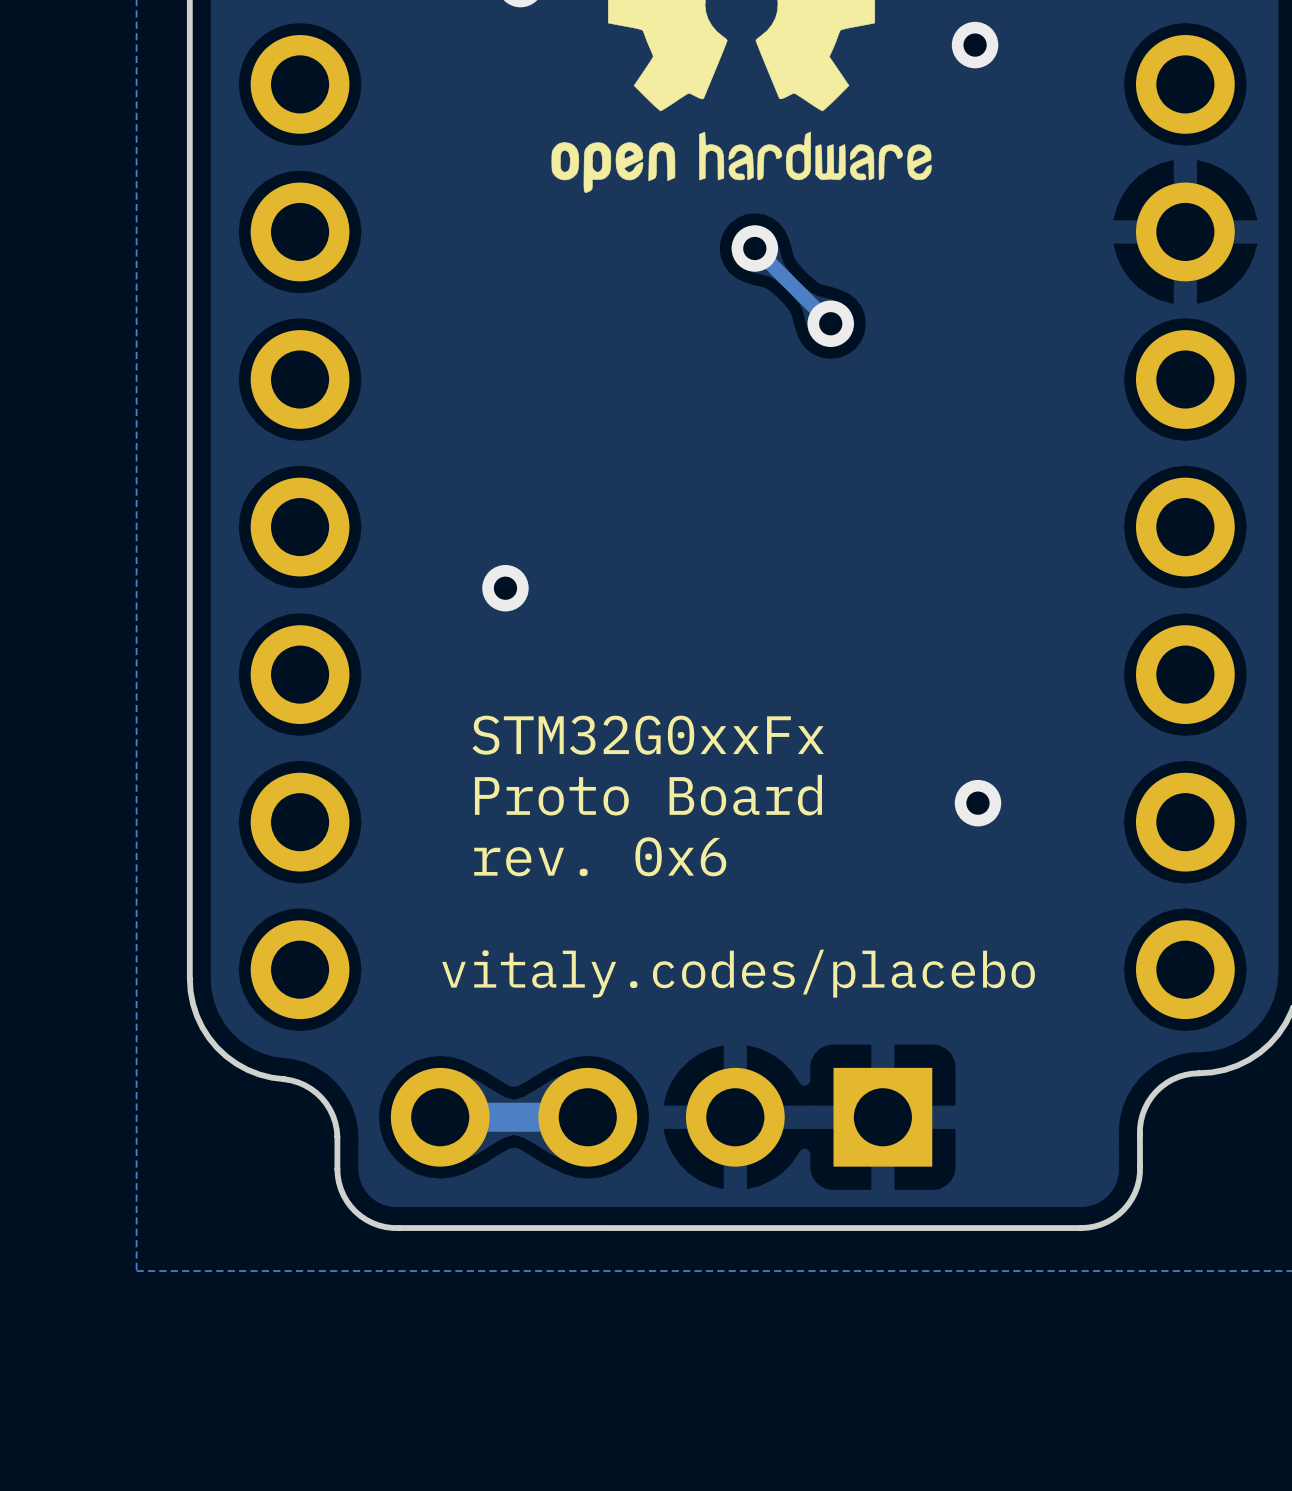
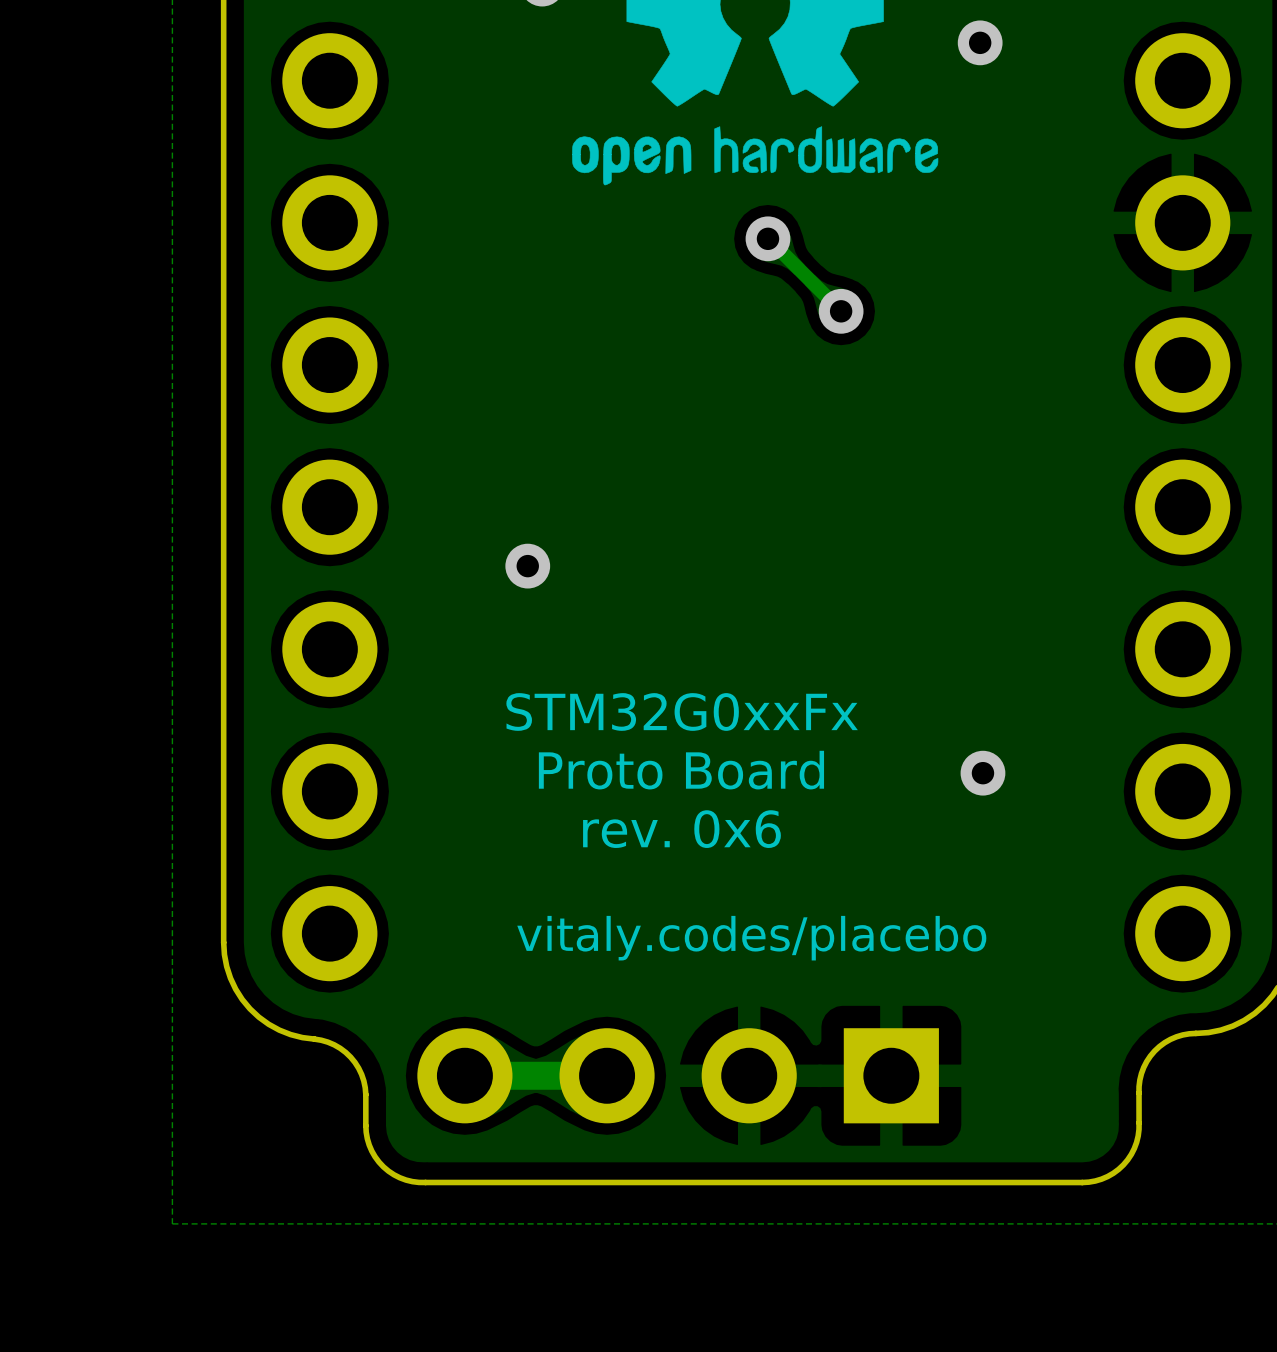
text position: STM32G0xxFx (648, 735) -> STM32G0xxFx (682, 711)
text position: Proto Board (648, 795) -> Proto Board (681, 770)
text position: rev. 0x6 (600, 856) -> rev. 0x6 (681, 829)

